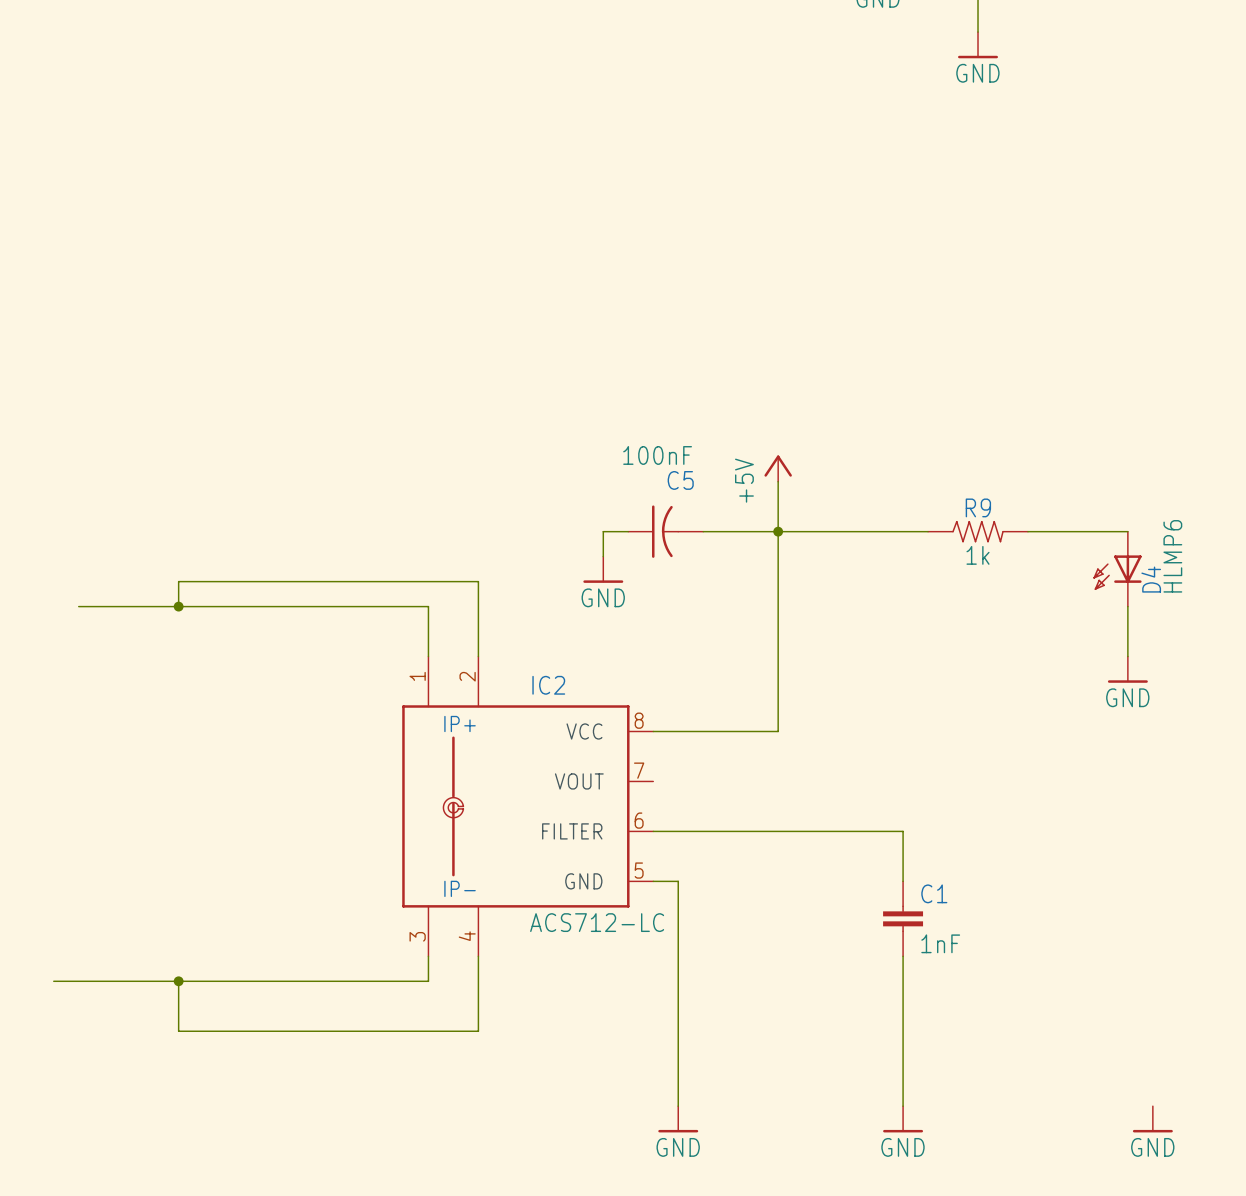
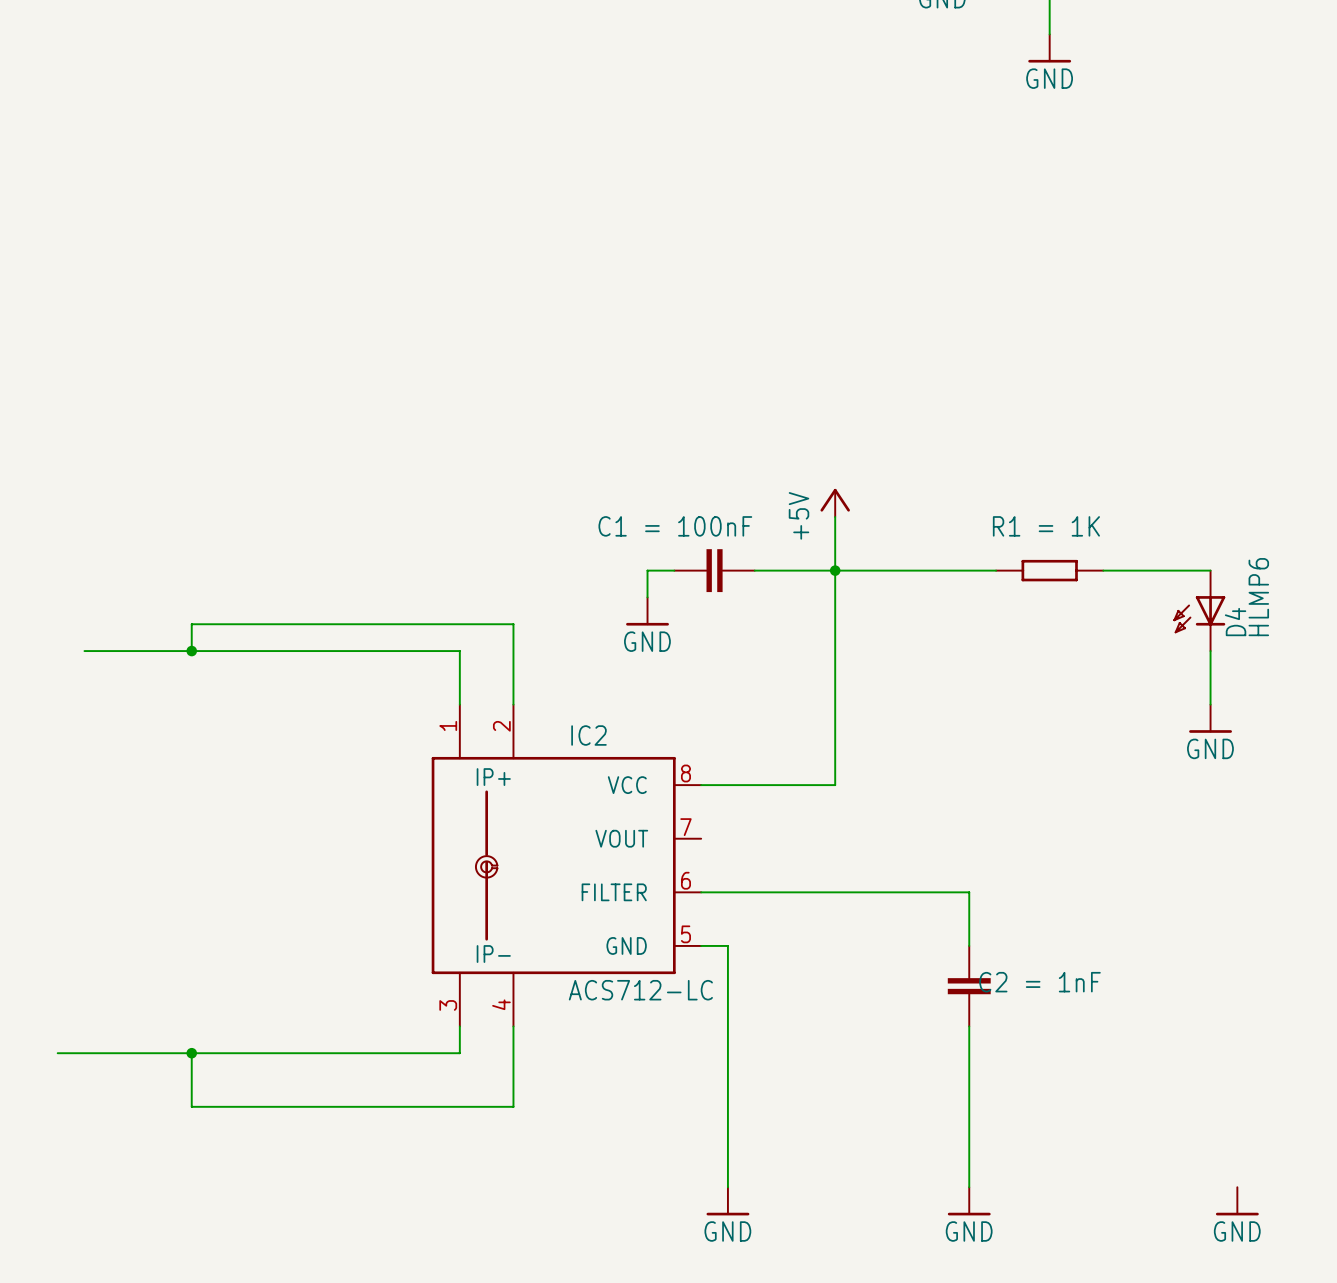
C5: 100nF (665, 531) -> none
part: none -> (714, 570)
R9: 1k (978, 531) -> none
part: none -> (1049, 570)
C1: 1nF (903, 918) -> none
part: none -> (969, 986)

